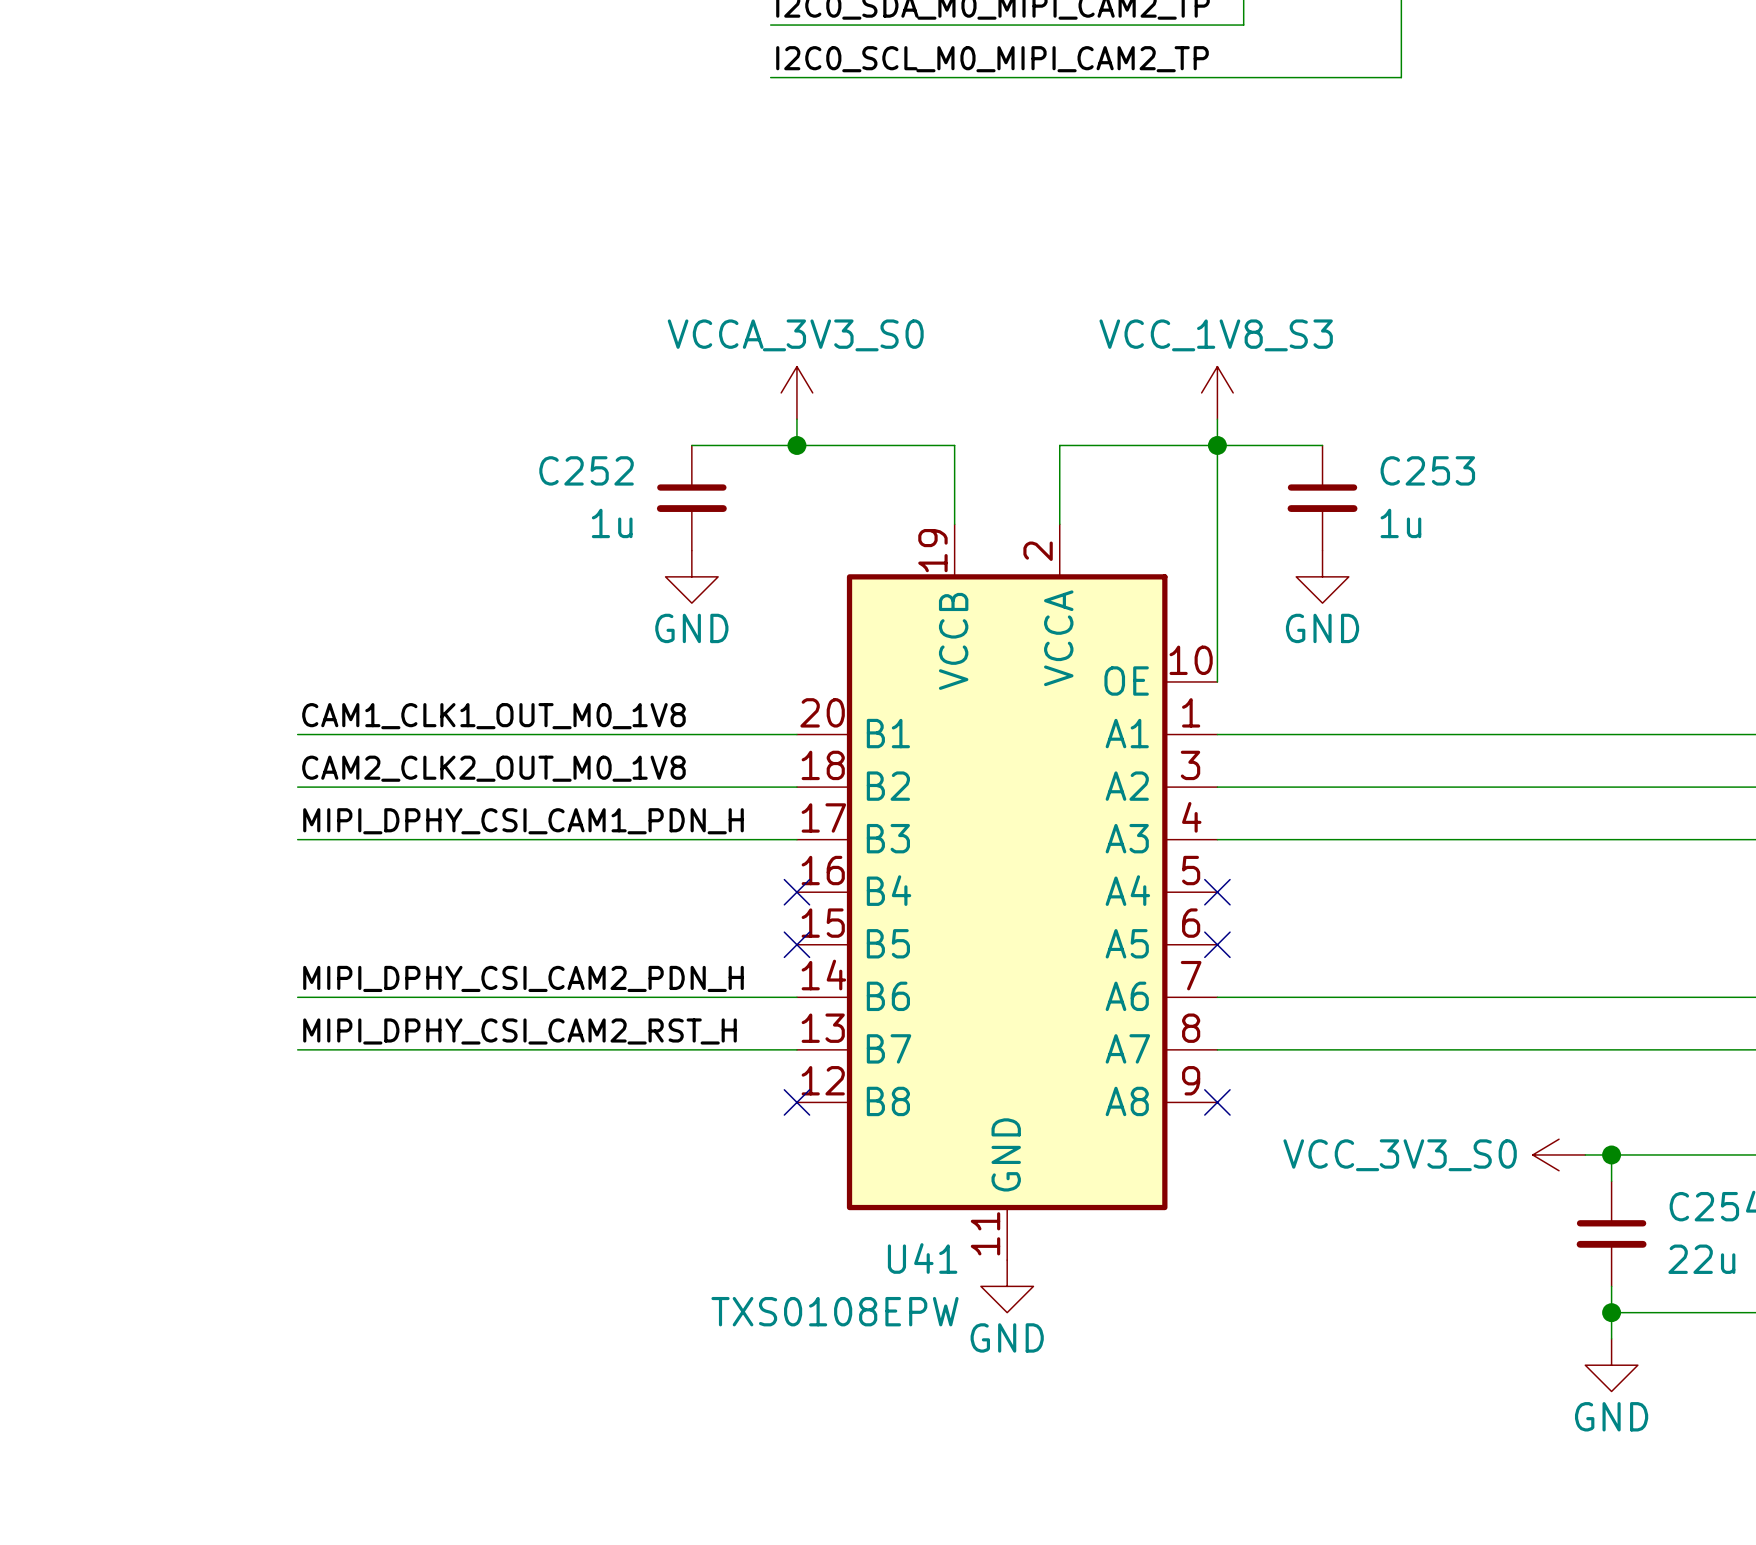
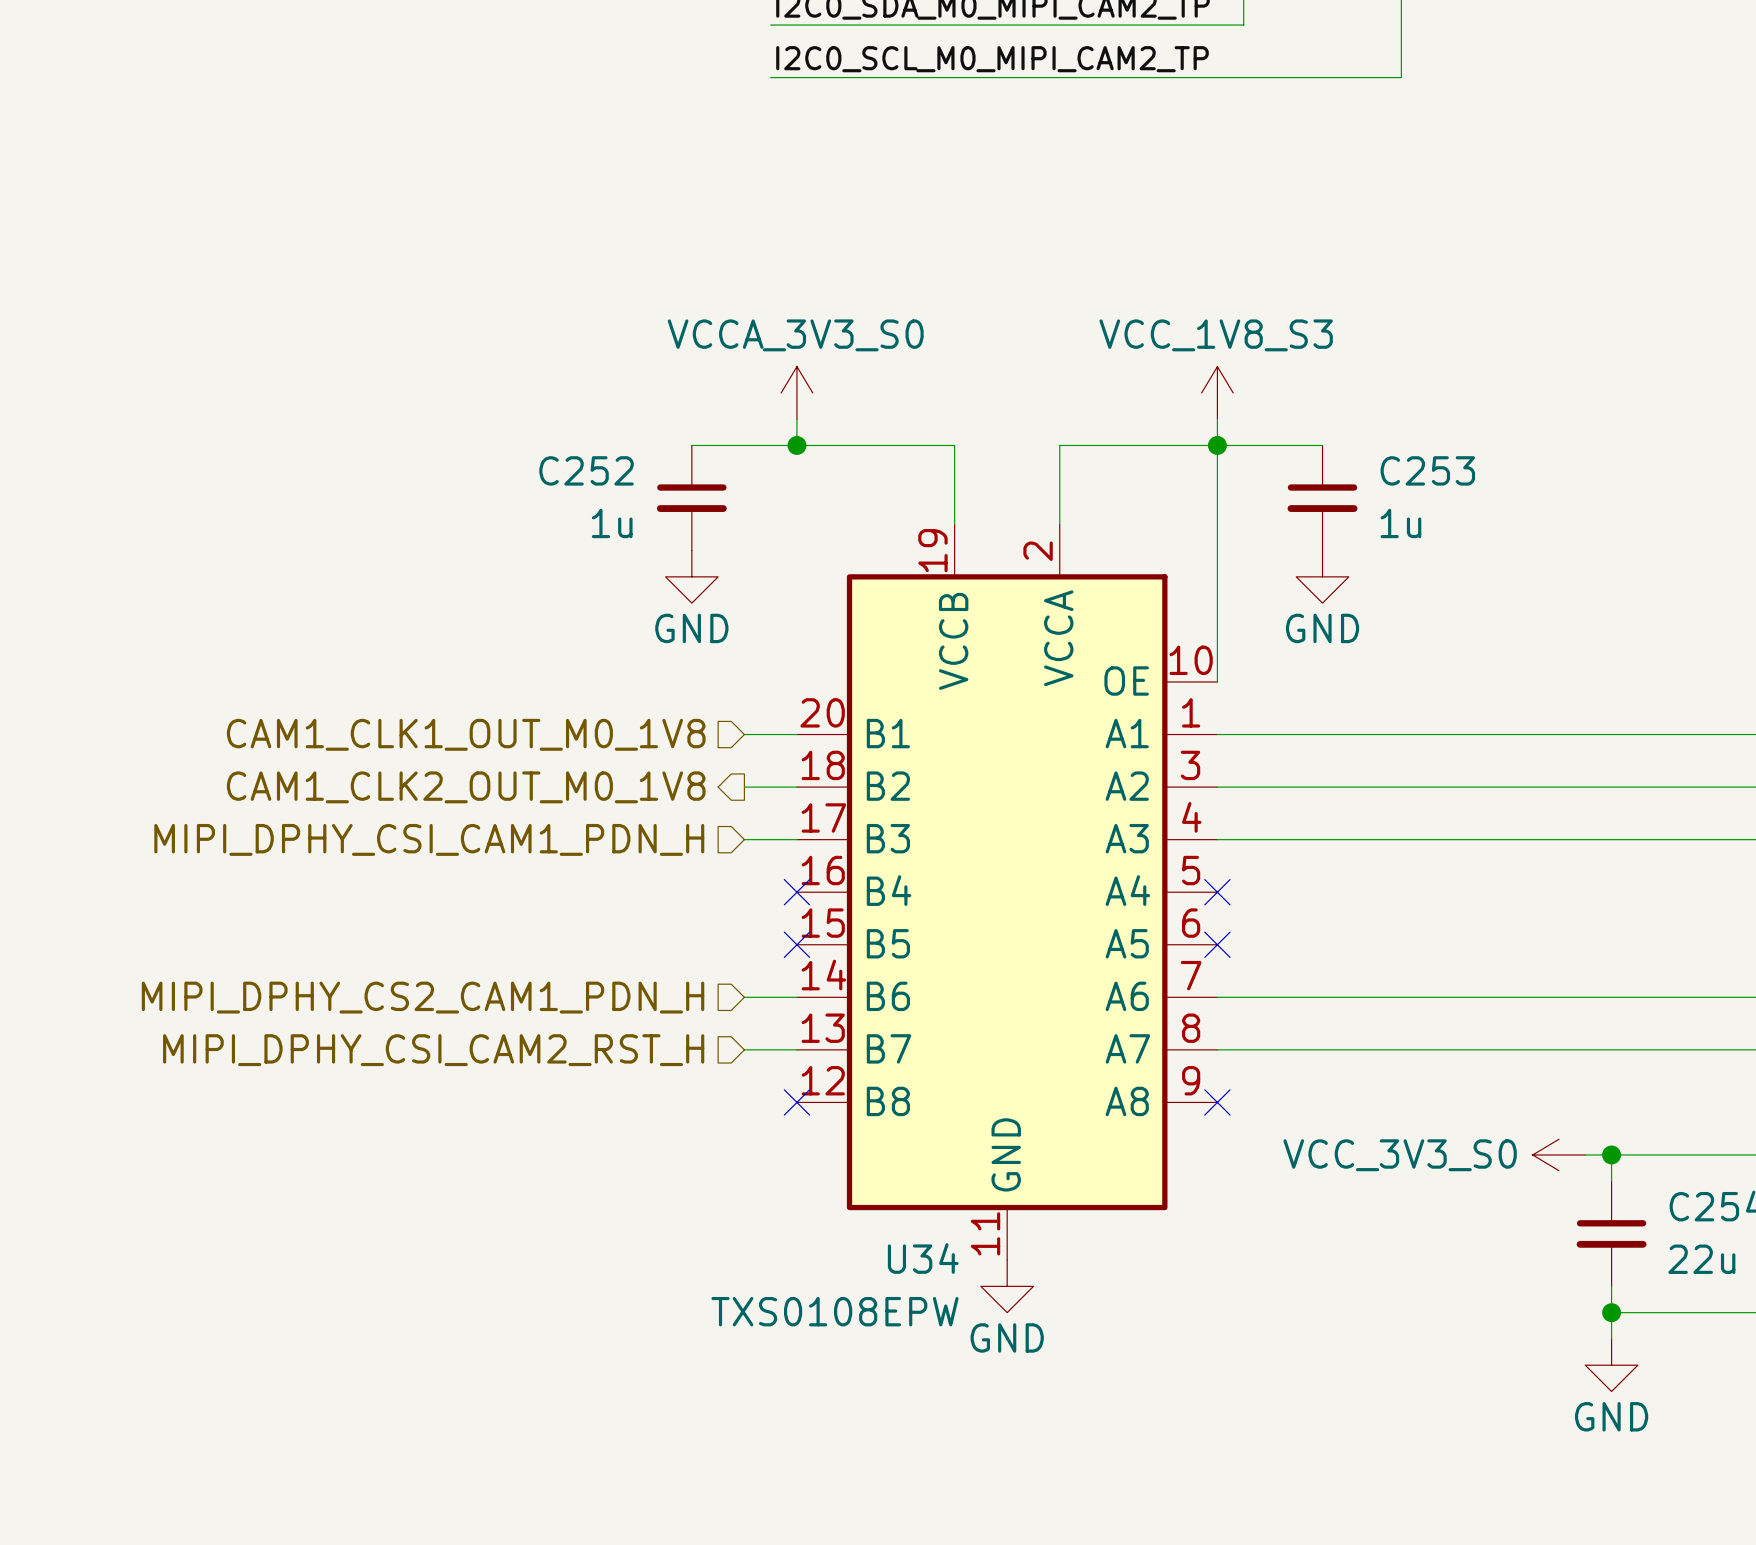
label: CAM1_CLK1_OUT_M0_1V8 (493, 716) -> none
wire: (297, 734) (744, 734) -> none
hierarchical label: none -> CAM1_CLK1_OUT_M0_1V8 (466, 734)
label: CAM2_CLK2_OUT_M0_1V8 (493, 768) -> none
wire: (297, 787) (744, 787) -> none
hierarchical label: none -> CAM1_CLK2_OUT_M0_1V8 (466, 787)
label: MIPI_DPHY_CSI_CAM1_PDN_H (523, 821) -> none
wire: (297, 839) (744, 839) -> none
hierarchical label: none -> MIPI_DPHY_CSI_CAM1_PDN_H (429, 839)
label: MIPI_DPHY_CSI_CAM2_PDN_H (523, 978) -> none
wire: (297, 997) (744, 997) -> none
hierarchical label: none -> MIPI_DPHY_CS2_CAM1_PDN_H (423, 997)
label: MIPI_DPHY_CSI_CAM2_RST_H (519, 1031) -> none
wire: (297, 1049) (744, 1049) -> none
hierarchical label: none -> MIPI_DPHY_CSI_CAM2_RST_H (433, 1050)
U41 name: U41 (922, 1258) -> U34 (923, 1258)

